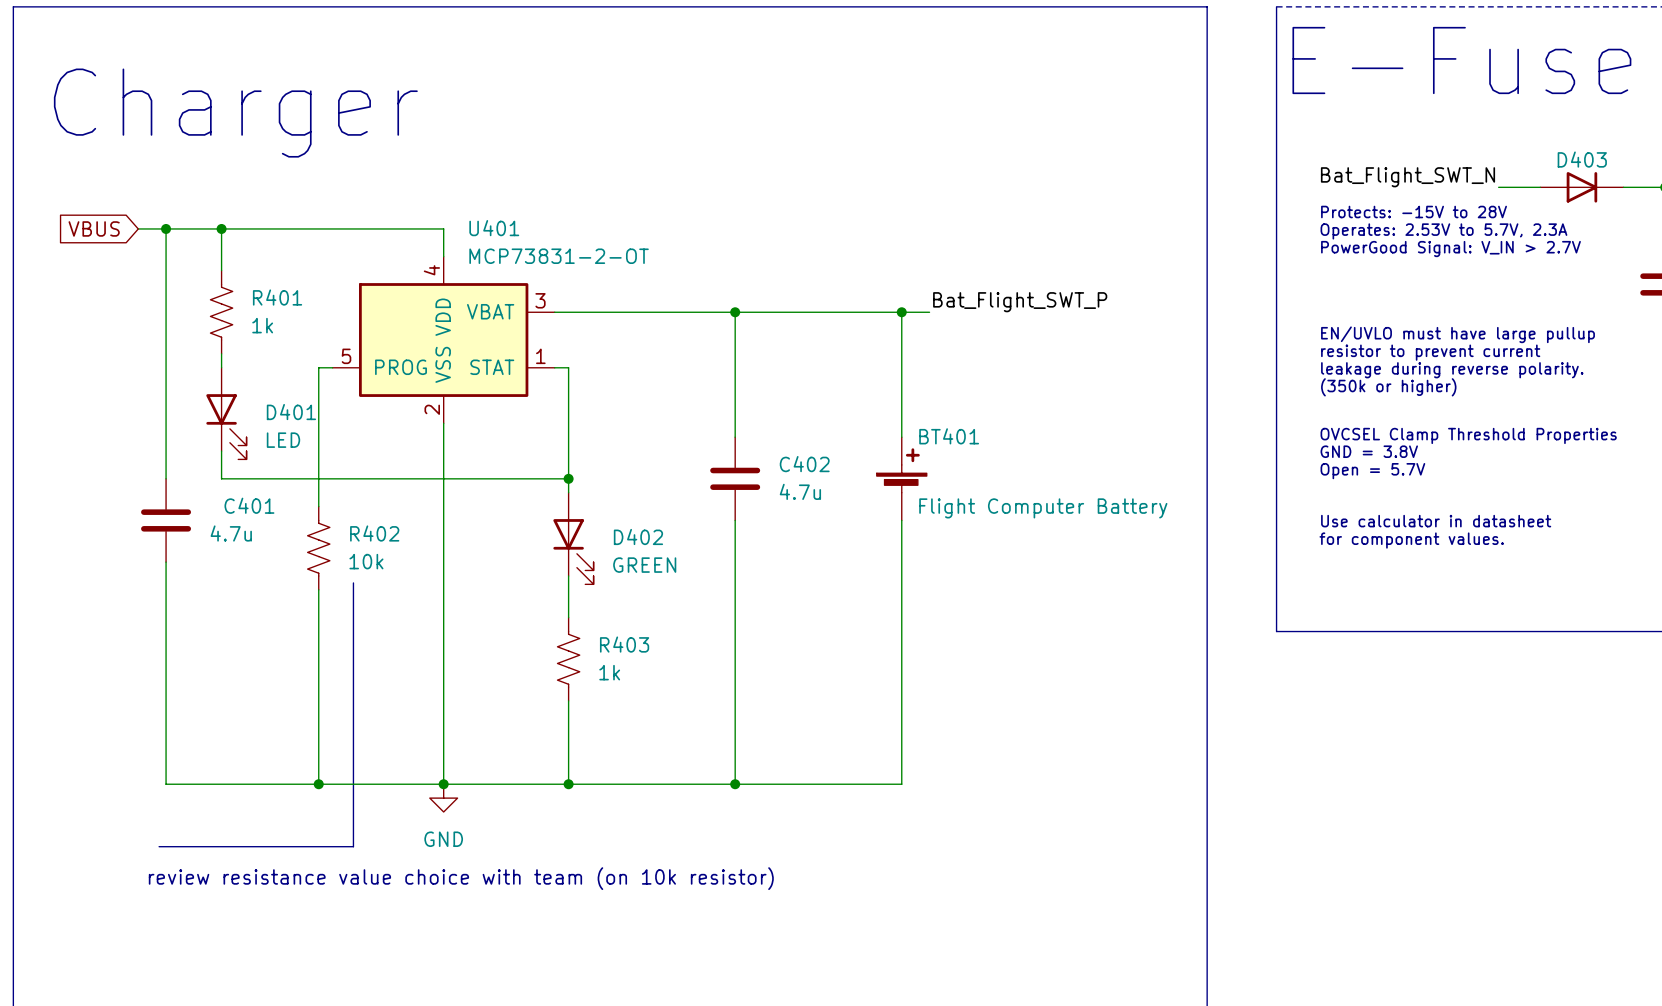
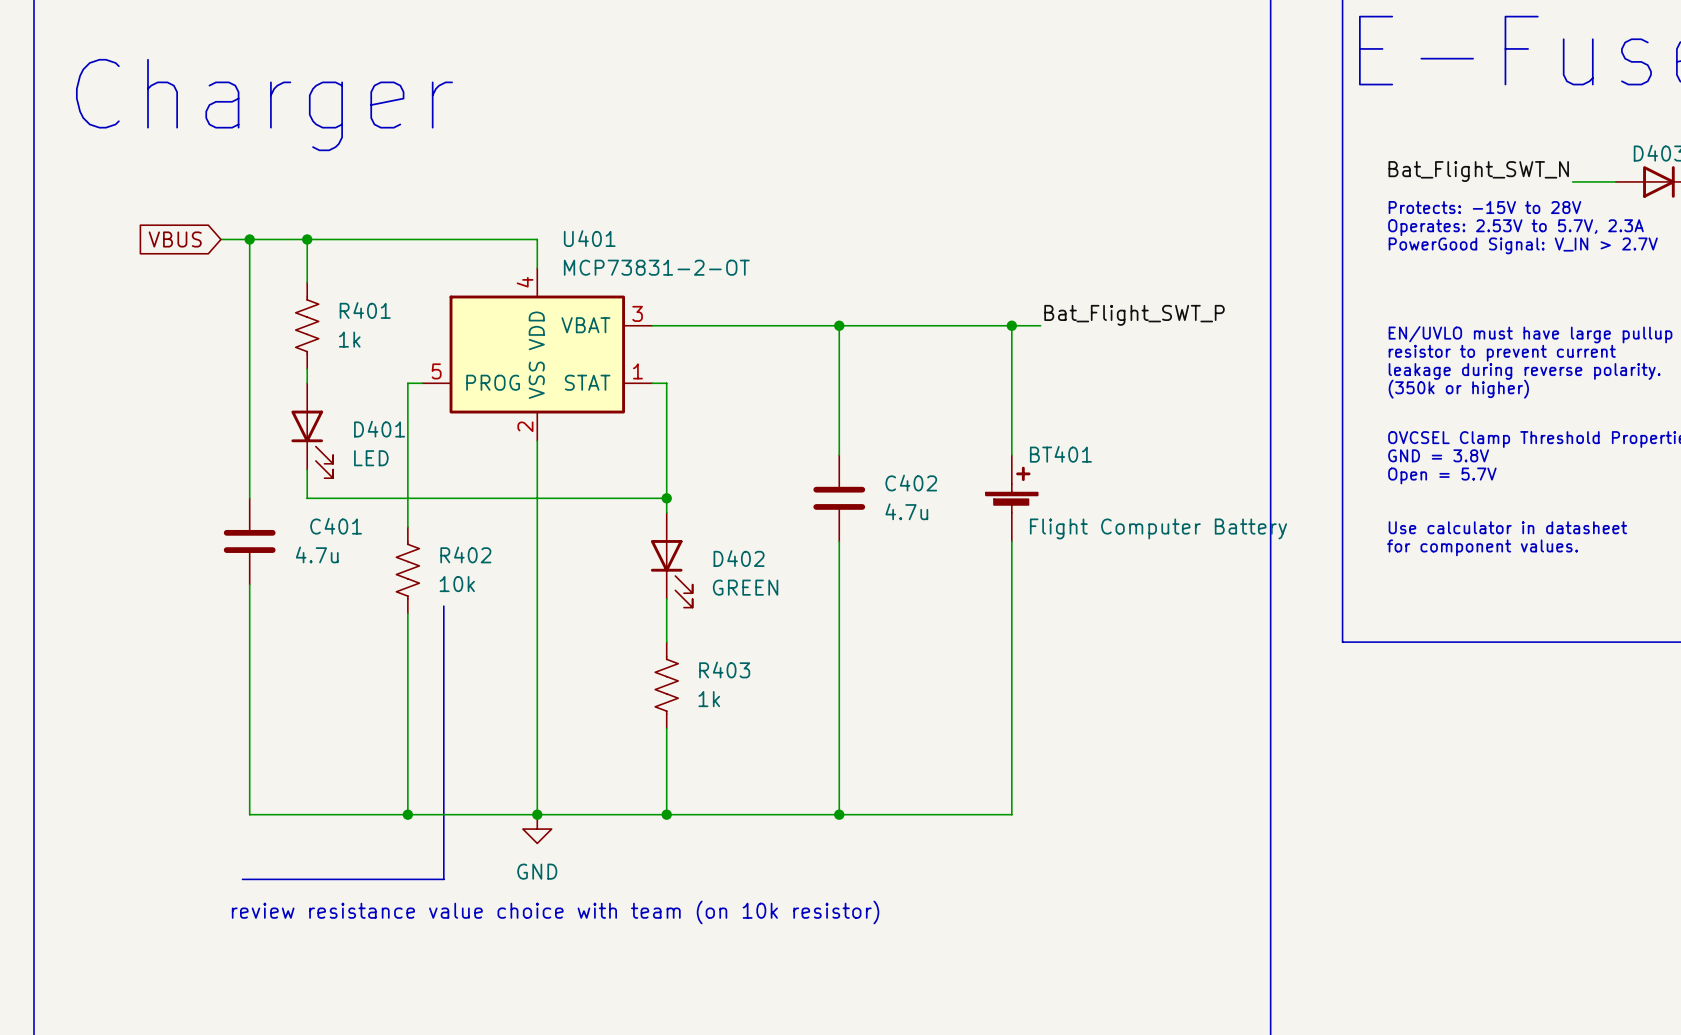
global label position: VBUS (94, 228) -> VBUS (175, 239)
wire: (138, 228) (443, 228) (443, 256) -> (220, 239) (537, 239) (537, 268)
wire: (166, 228) (166, 478) -> none
junction: (166, 228) -> none
wire: (221, 228) (221, 242) -> (307, 368) (307, 383)
junction position: (221, 228) -> (249, 239)
wire: none -> (307, 239) (307, 282)
junction: none -> (307, 239)
label position: Bat_Flight_SWT_P (1020, 302) -> Bat_Flight_SWT_P (1134, 315)
R401 position: (221, 312) -> (307, 325)
wire: (554, 312) (929, 312) -> (652, 325) (1040, 325)
wire: (735, 312) (735, 437) -> (839, 325) (839, 455)
junction: (735, 312) -> none
wire: (901, 312) (901, 437) -> (1011, 325) (1011, 455)
junction: (901, 312) -> none
junction: none -> (839, 325)
junction: none -> (1011, 325)
U401 position: (443, 340) -> (537, 354)
wire: (332, 367) (318, 367) (318, 506) -> (422, 383) (407, 383) (407, 527)
wire: (554, 367) (568, 367) (568, 492) -> (652, 383) (666, 383) (666, 512)
D401 position: (226, 413) -> (312, 430)
wire: (443, 423) (443, 784) -> (537, 440) (537, 814)
wire: none -> (307, 469) (307, 498) (666, 498)
wire: (221, 478) (568, 478) -> (249, 483) (249, 498)
junction position: (568, 478) -> (666, 498)
C402 position: (735, 478) -> (839, 498)
BT401 position: (901, 478) -> (1011, 498)
C401 position: (166, 520) -> (249, 541)
wire: (735, 520) (735, 784) -> (839, 541) (839, 814)
wire: (901, 520) (901, 784) (166, 784) (166, 562) -> (1011, 541) (1011, 814) (249, 814) (249, 584)
D402 position: (573, 538) -> (671, 560)
R402 position: (318, 548) -> (407, 570)
wire: (568, 576) (568, 617) -> (666, 598) (666, 642)
line: (353, 582) (353, 846) (159, 846) -> (443, 606) (443, 879) (242, 879)
wire: (318, 589) (318, 784) -> (407, 613) (407, 814)
R403 position: (568, 659) -> (666, 685)
wire: (568, 700) (568, 784) -> (666, 728) (666, 814)
junction: (318, 784) -> none
junction: (443, 784) -> none
junction: (568, 784) -> none
junction: (735, 784) -> none
junction: none -> (407, 814)
power symbol position: GND (443, 798) -> GND (537, 829)
junction: none -> (537, 814)
junction: none -> (666, 814)
junction: none -> (839, 814)
text position: review resistance value choice with team (on 10k resistor) (461, 878) -> review resistance value choice with team (on 10k resistor) (555, 912)

